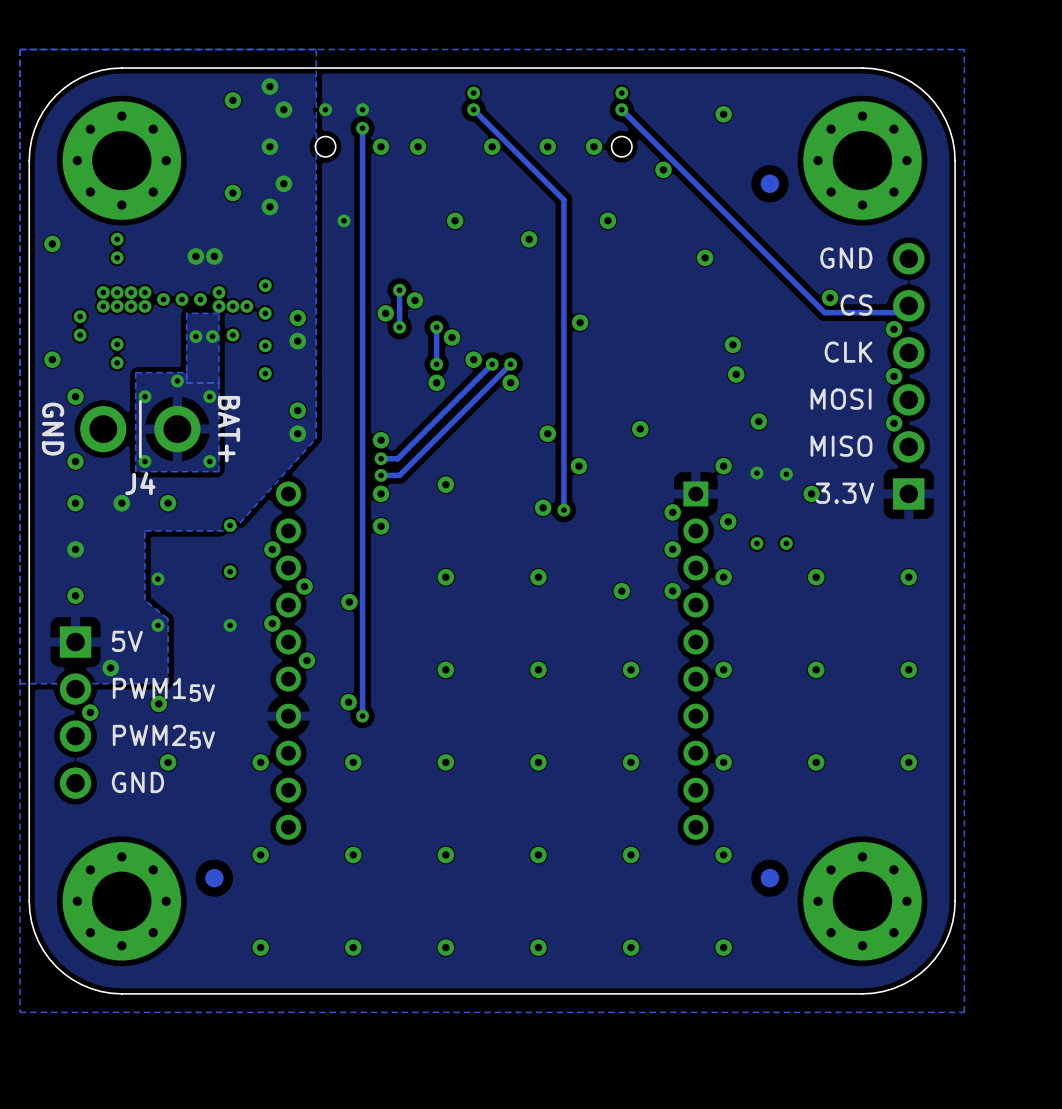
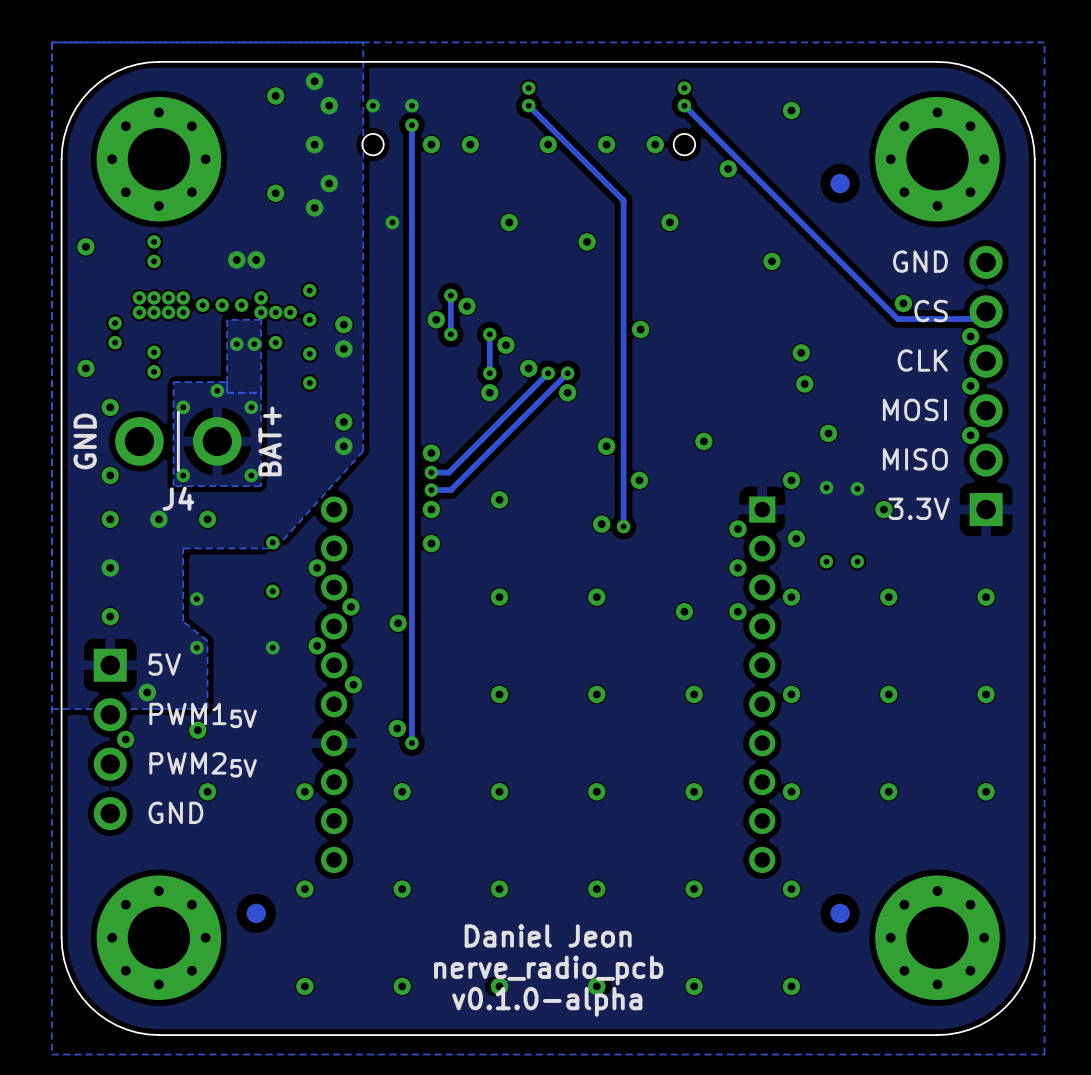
text rotation: 0° (53, 429) -> 180° (85, 441)
text rotation: 0° (228, 429) -> 180° (270, 441)
text: none -> Daniel Jeon (548, 935)
text: none -> nerve_radio_pcb (548, 970)
text: none -> v0.1.0-alpha (547, 1001)

